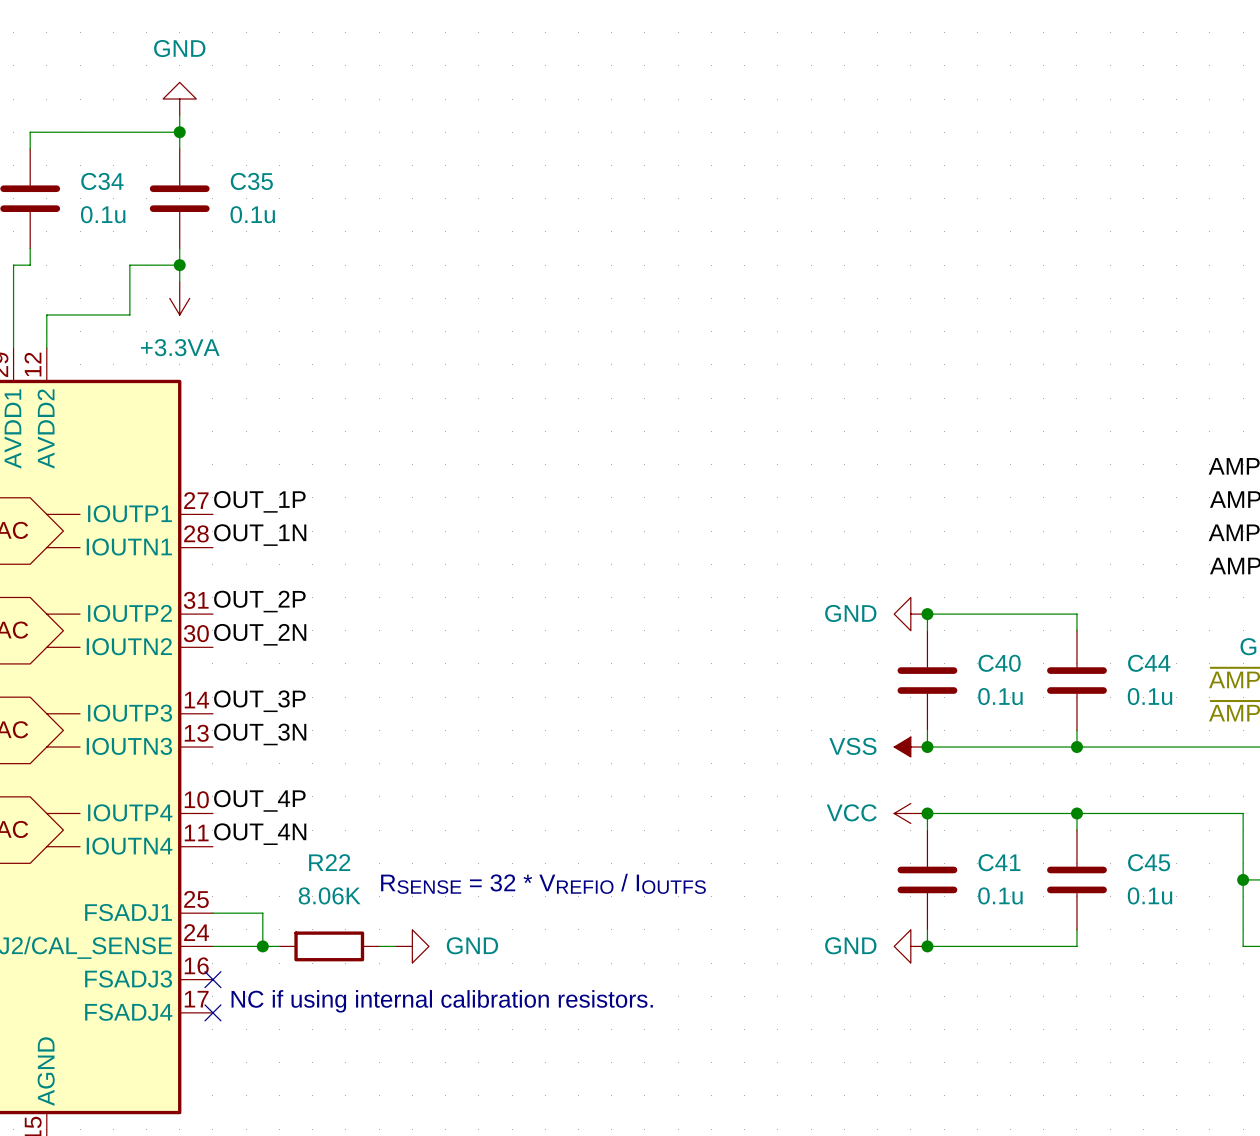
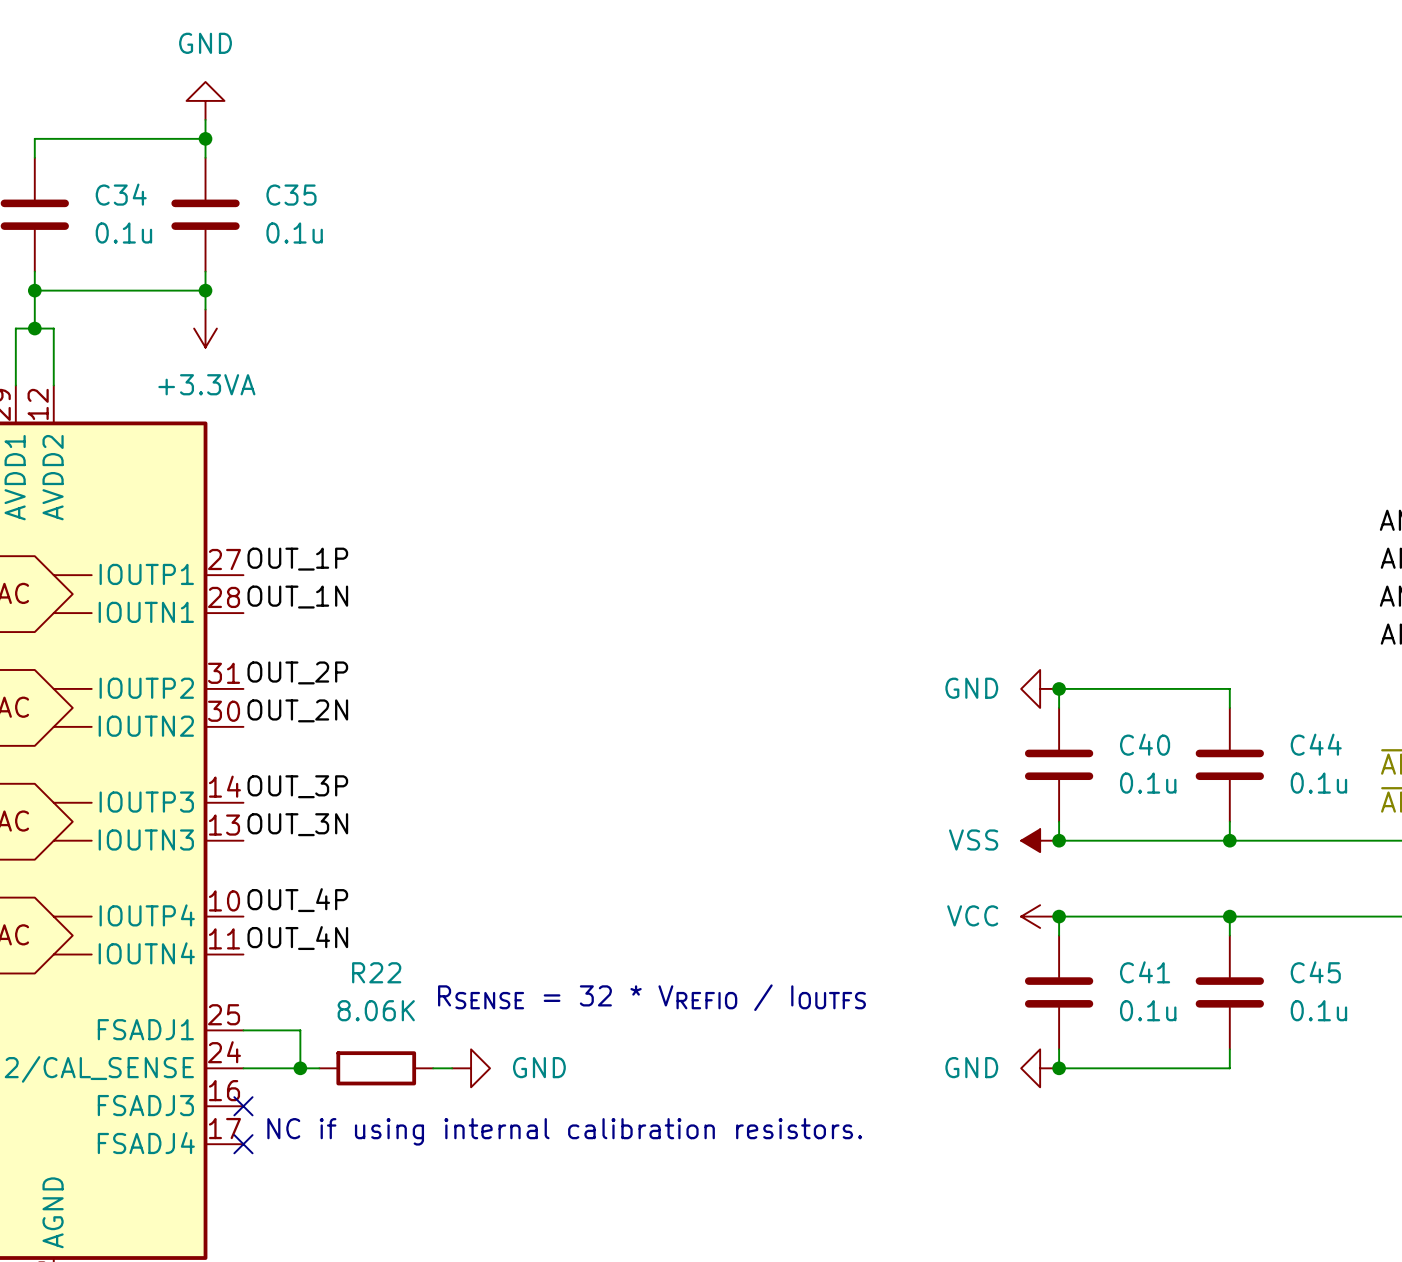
wire: (30, 265) (13, 265) (13, 298) -> (53, 347) (53, 328) (15, 328)
junction: none -> (34, 290)
wire: (129, 265) (129, 315) (46, 315) -> (148, 290) (34, 290) (34, 328)
junction: none -> (34, 328)

